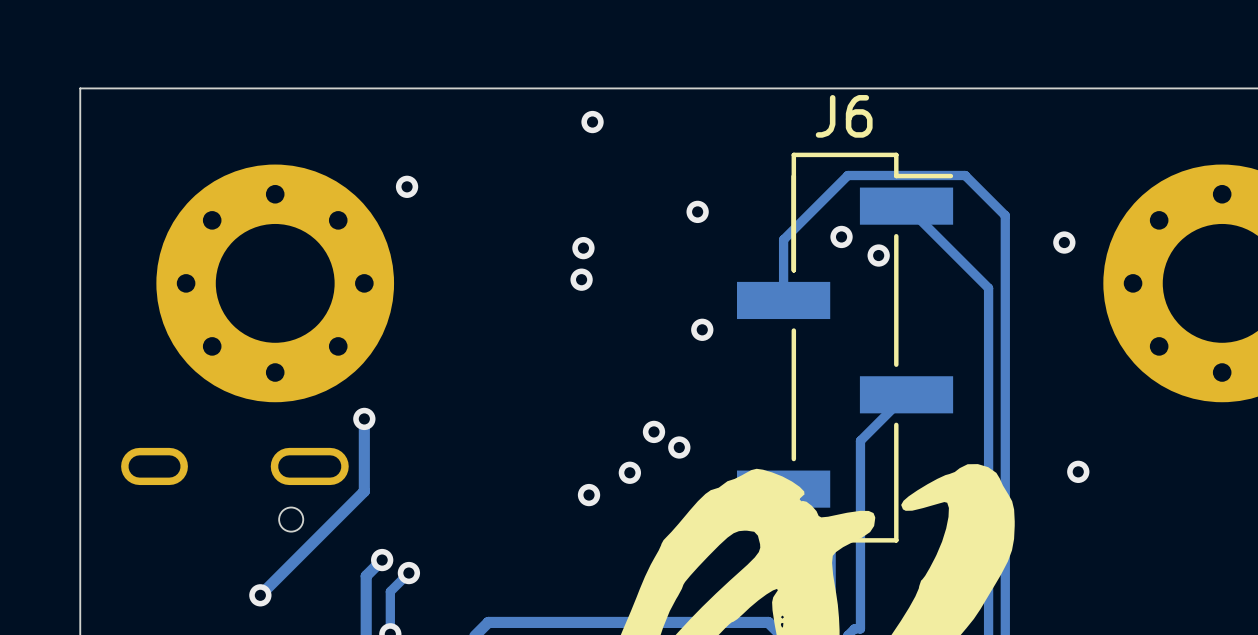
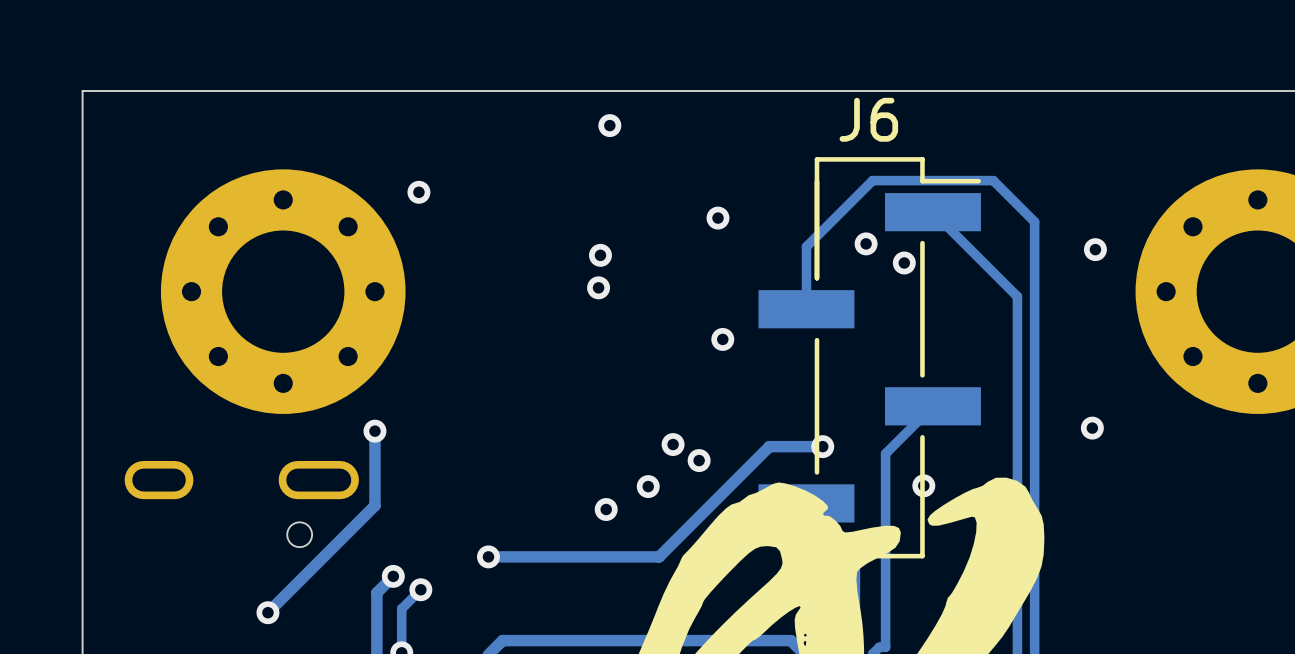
track: none -> (822, 446) (769, 446) (659, 556) (488, 556)
via: none -> (822, 446)
via position: (1078, 471) -> (1092, 428)
via: none -> (923, 485)
via: none -> (488, 556)

